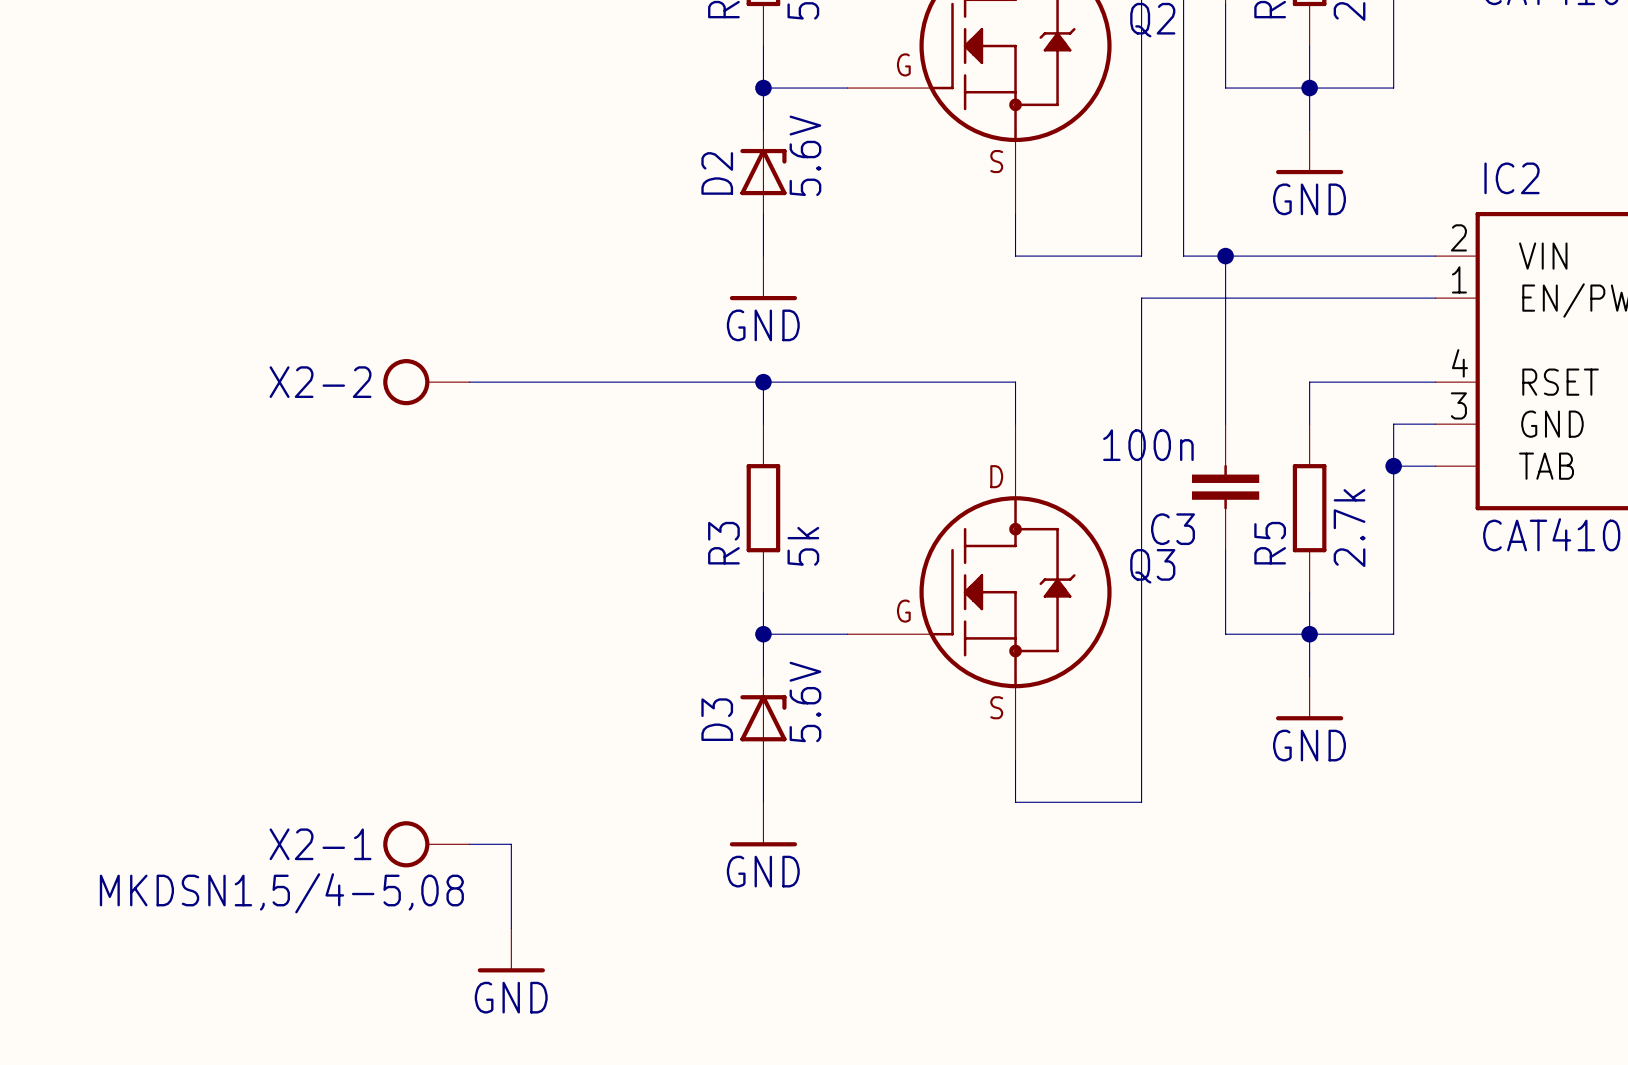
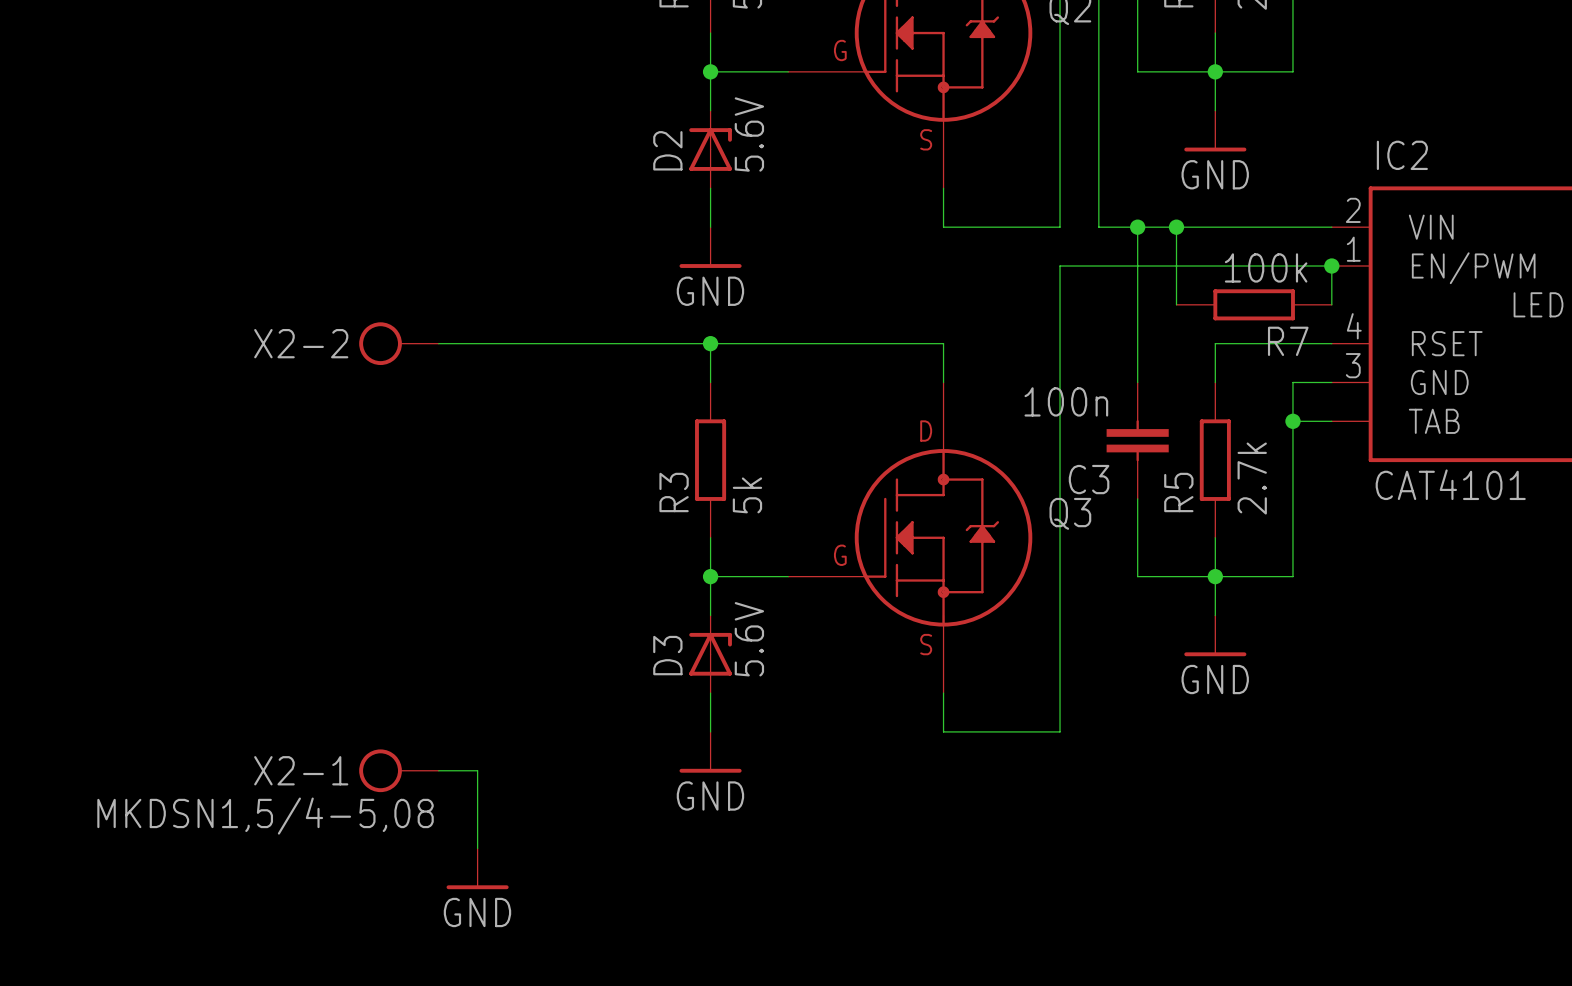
wire: none -> (1176, 227) (1176, 304)
junction: none -> (1176, 227)
wire: none -> (1331, 266) (1331, 304)
junction: none -> (1331, 266)
R7: none -> 100k (1254, 304)

